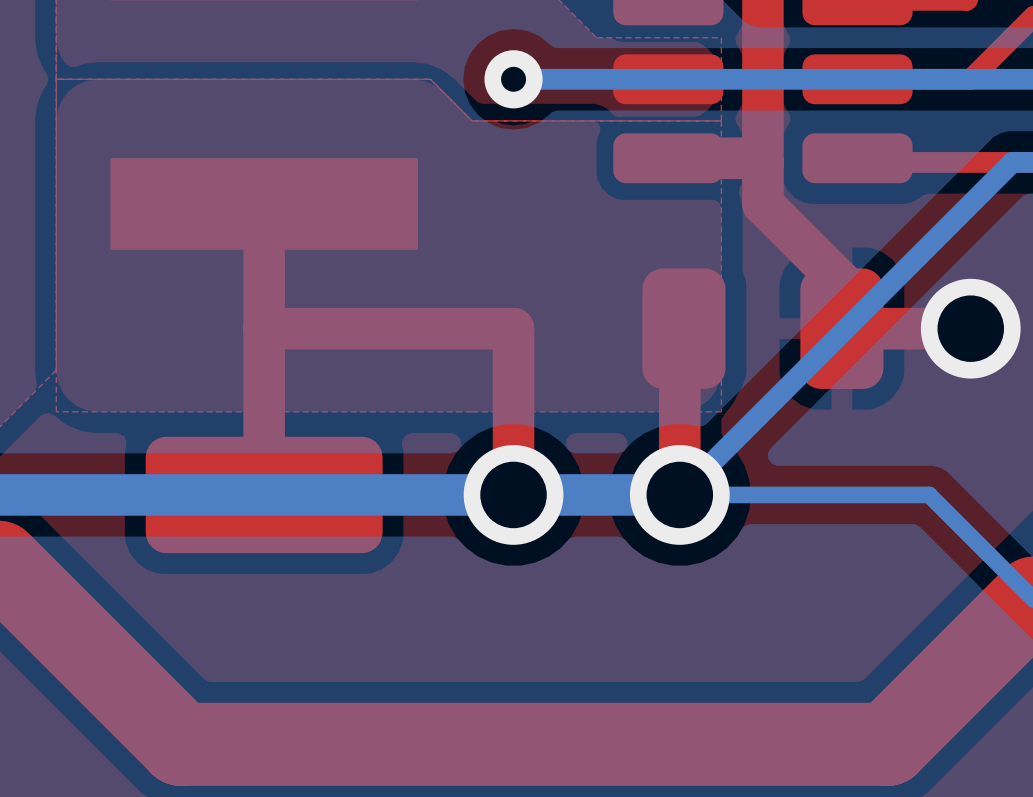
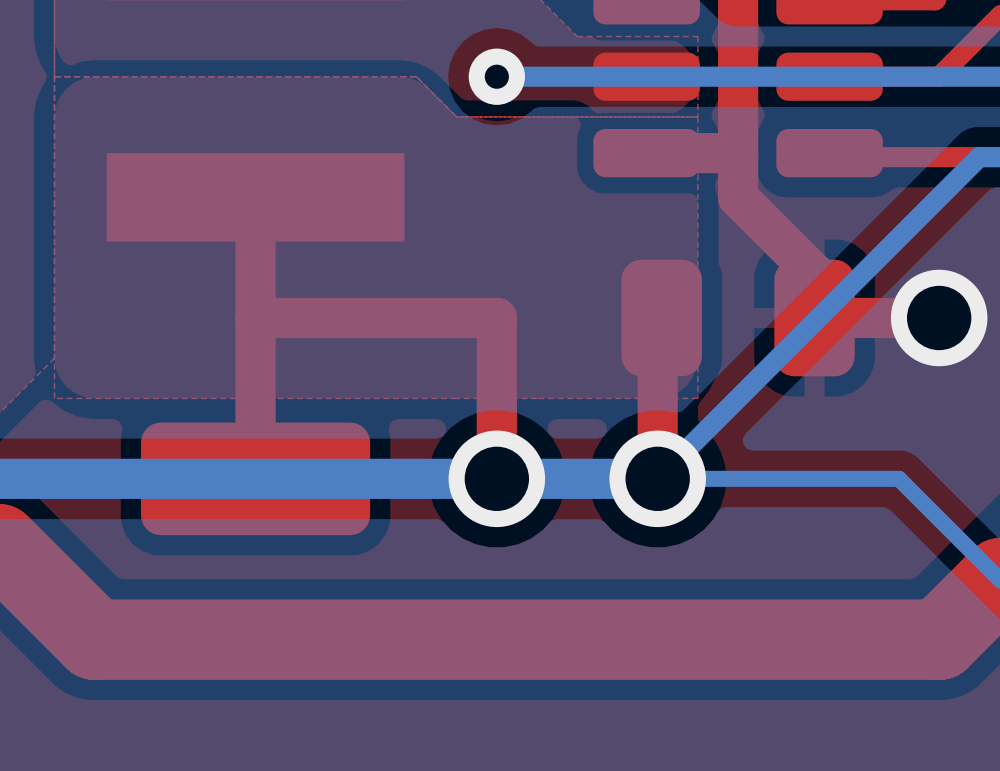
top track: (970, 661) (887, 744) (181, 744) (97, 661) -> (939, 639) (94, 639)

